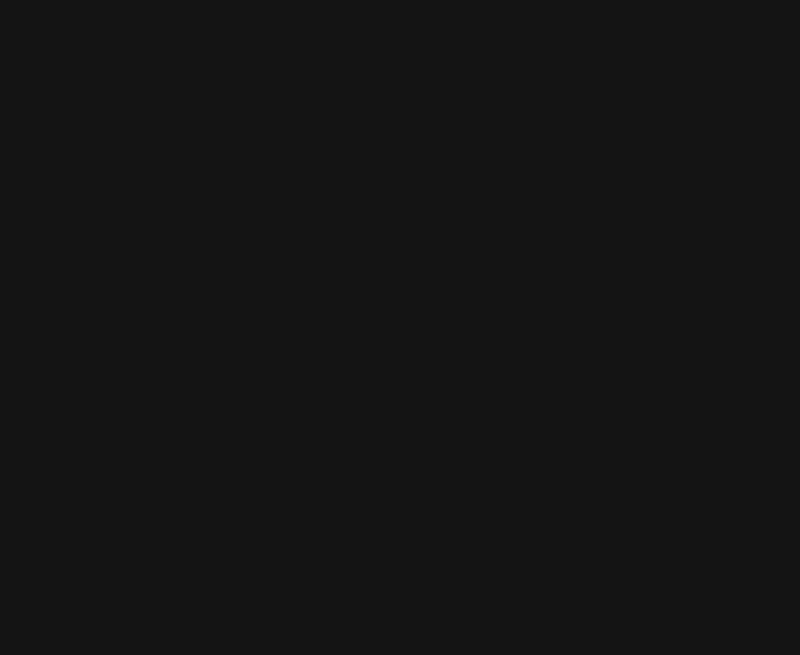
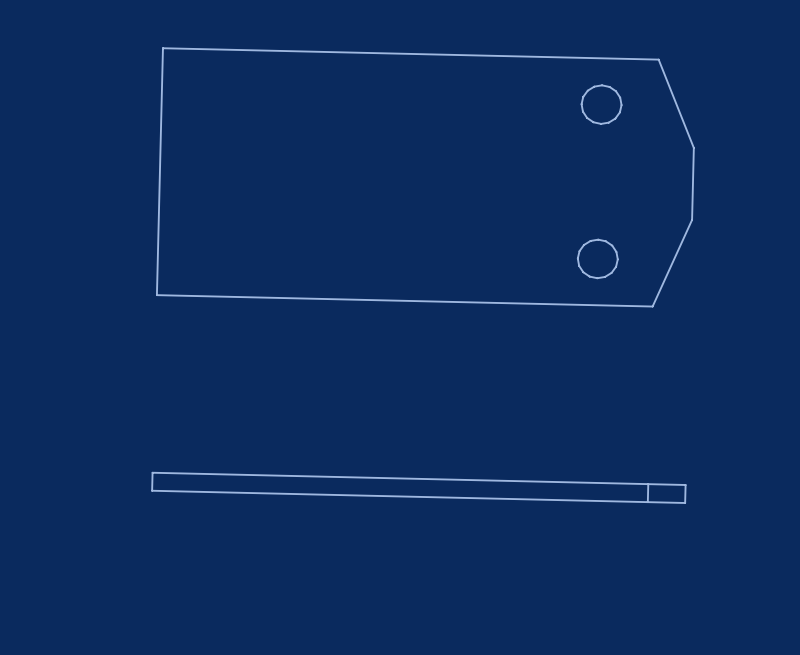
line: none -> (162, 48) (156, 295) (652, 306) (692, 219) (693, 147) (658, 59) (162, 48)
line: none -> (602, 85) (587, 90) (583, 96) (581, 104) (582, 111) (587, 117) (601, 123) (615, 118) (619, 112) (621, 105) (620, 97) (616, 91) (602, 85)
line: none -> (598, 239) (583, 244) (579, 251) (577, 258) (579, 265) (583, 272) (597, 278) (611, 272) (616, 266) (617, 259) (616, 251) (612, 245) (598, 239)
line: none -> (152, 472) (152, 490) (685, 502) (685, 484) (152, 472)
line: none -> (648, 484) (647, 502)

